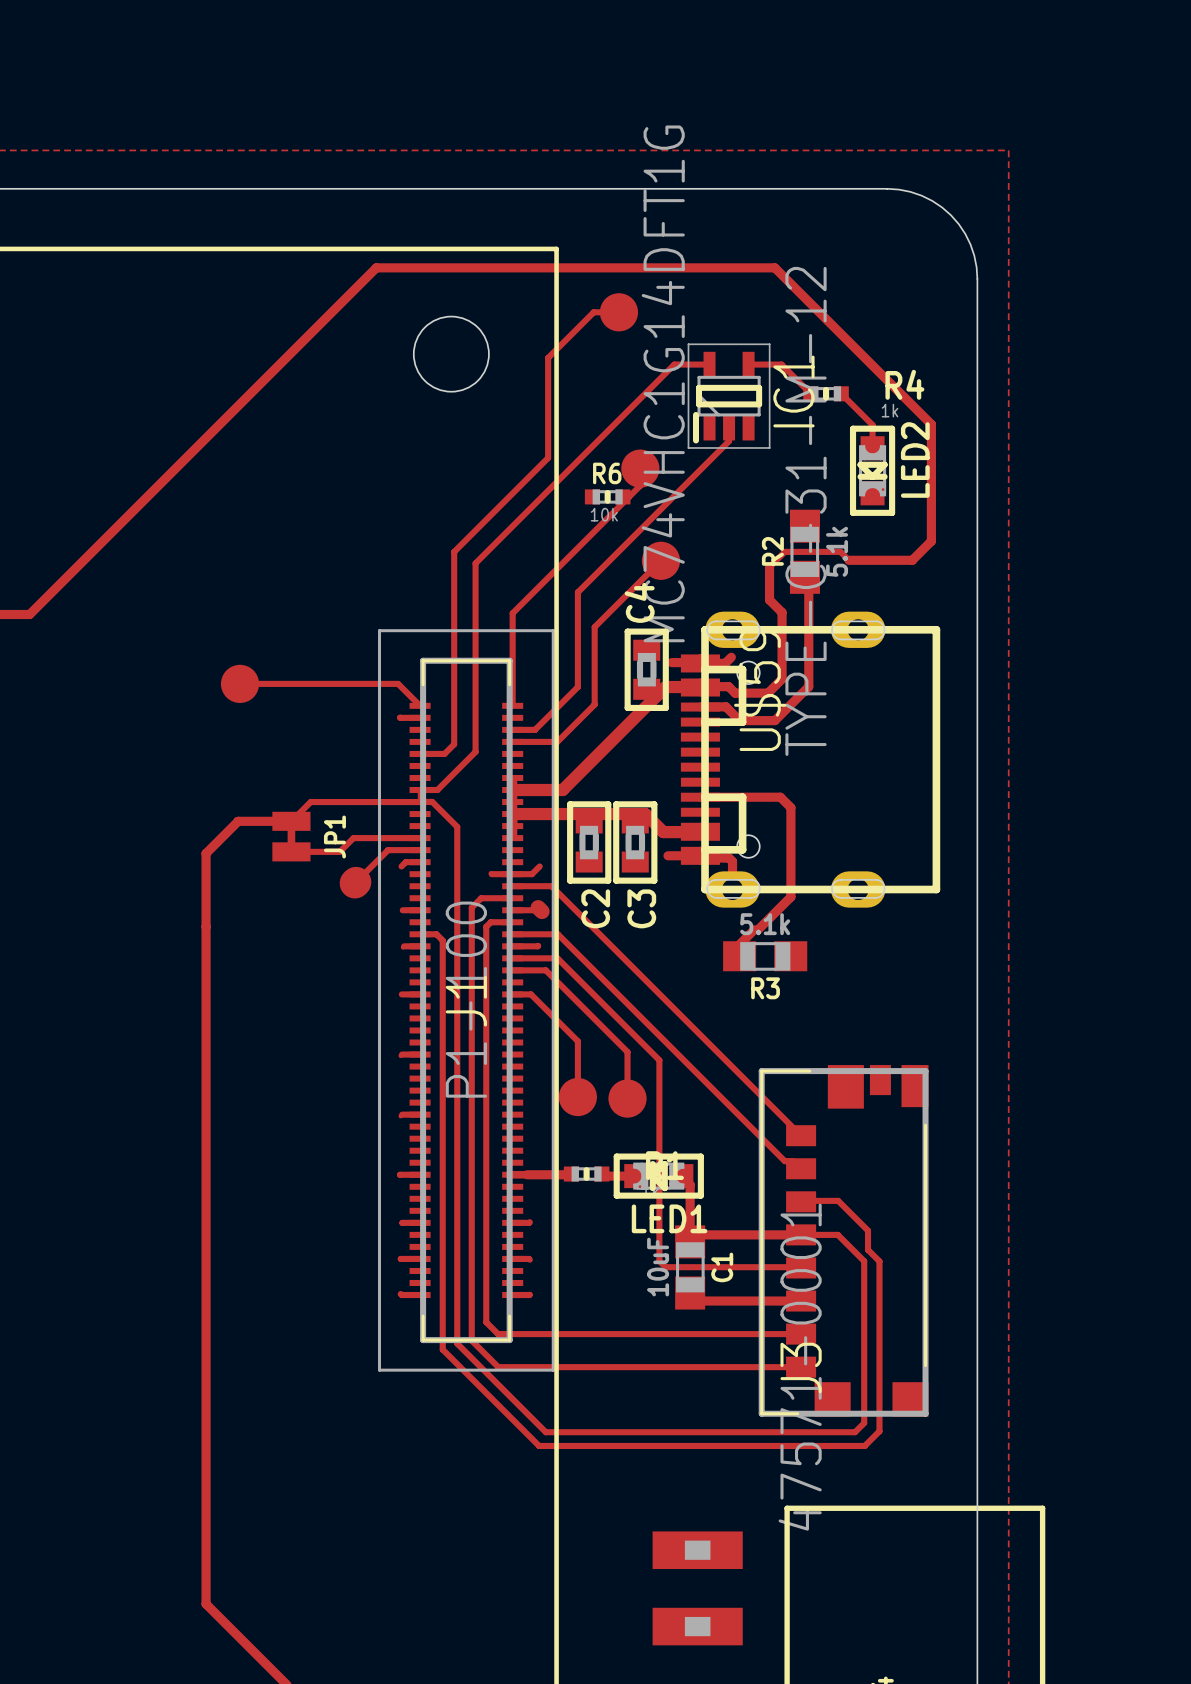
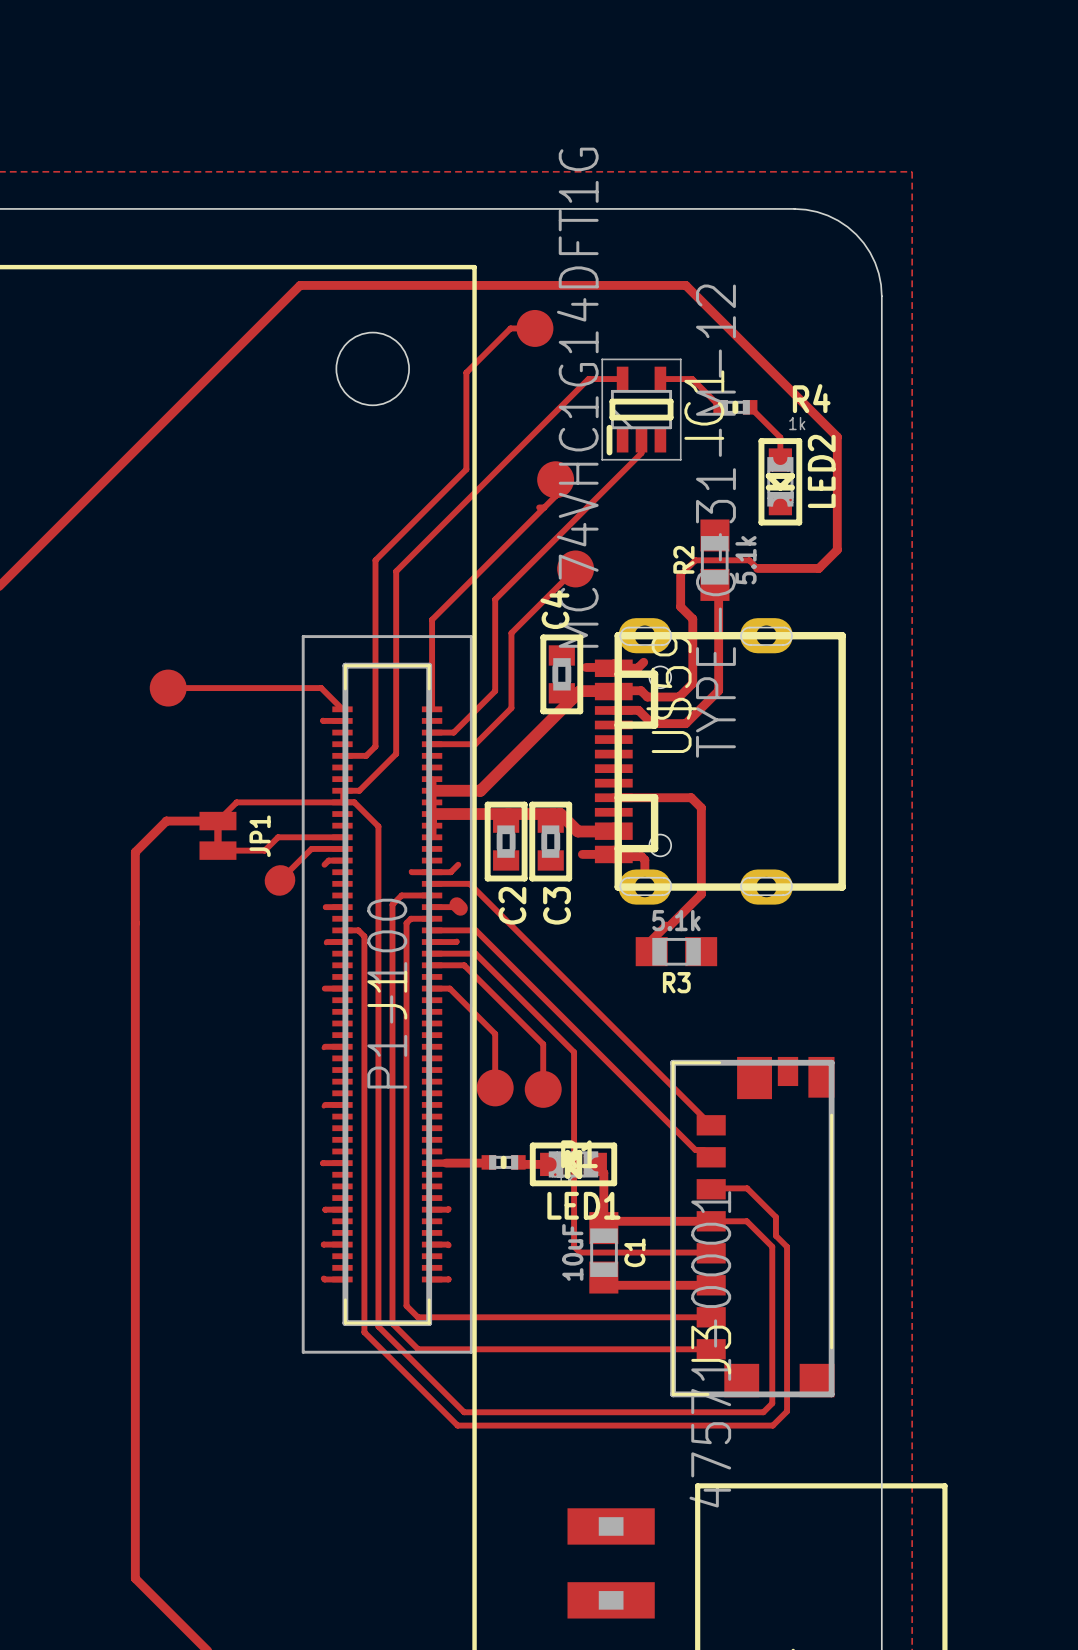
R6: 10k (607, 496) -> none

